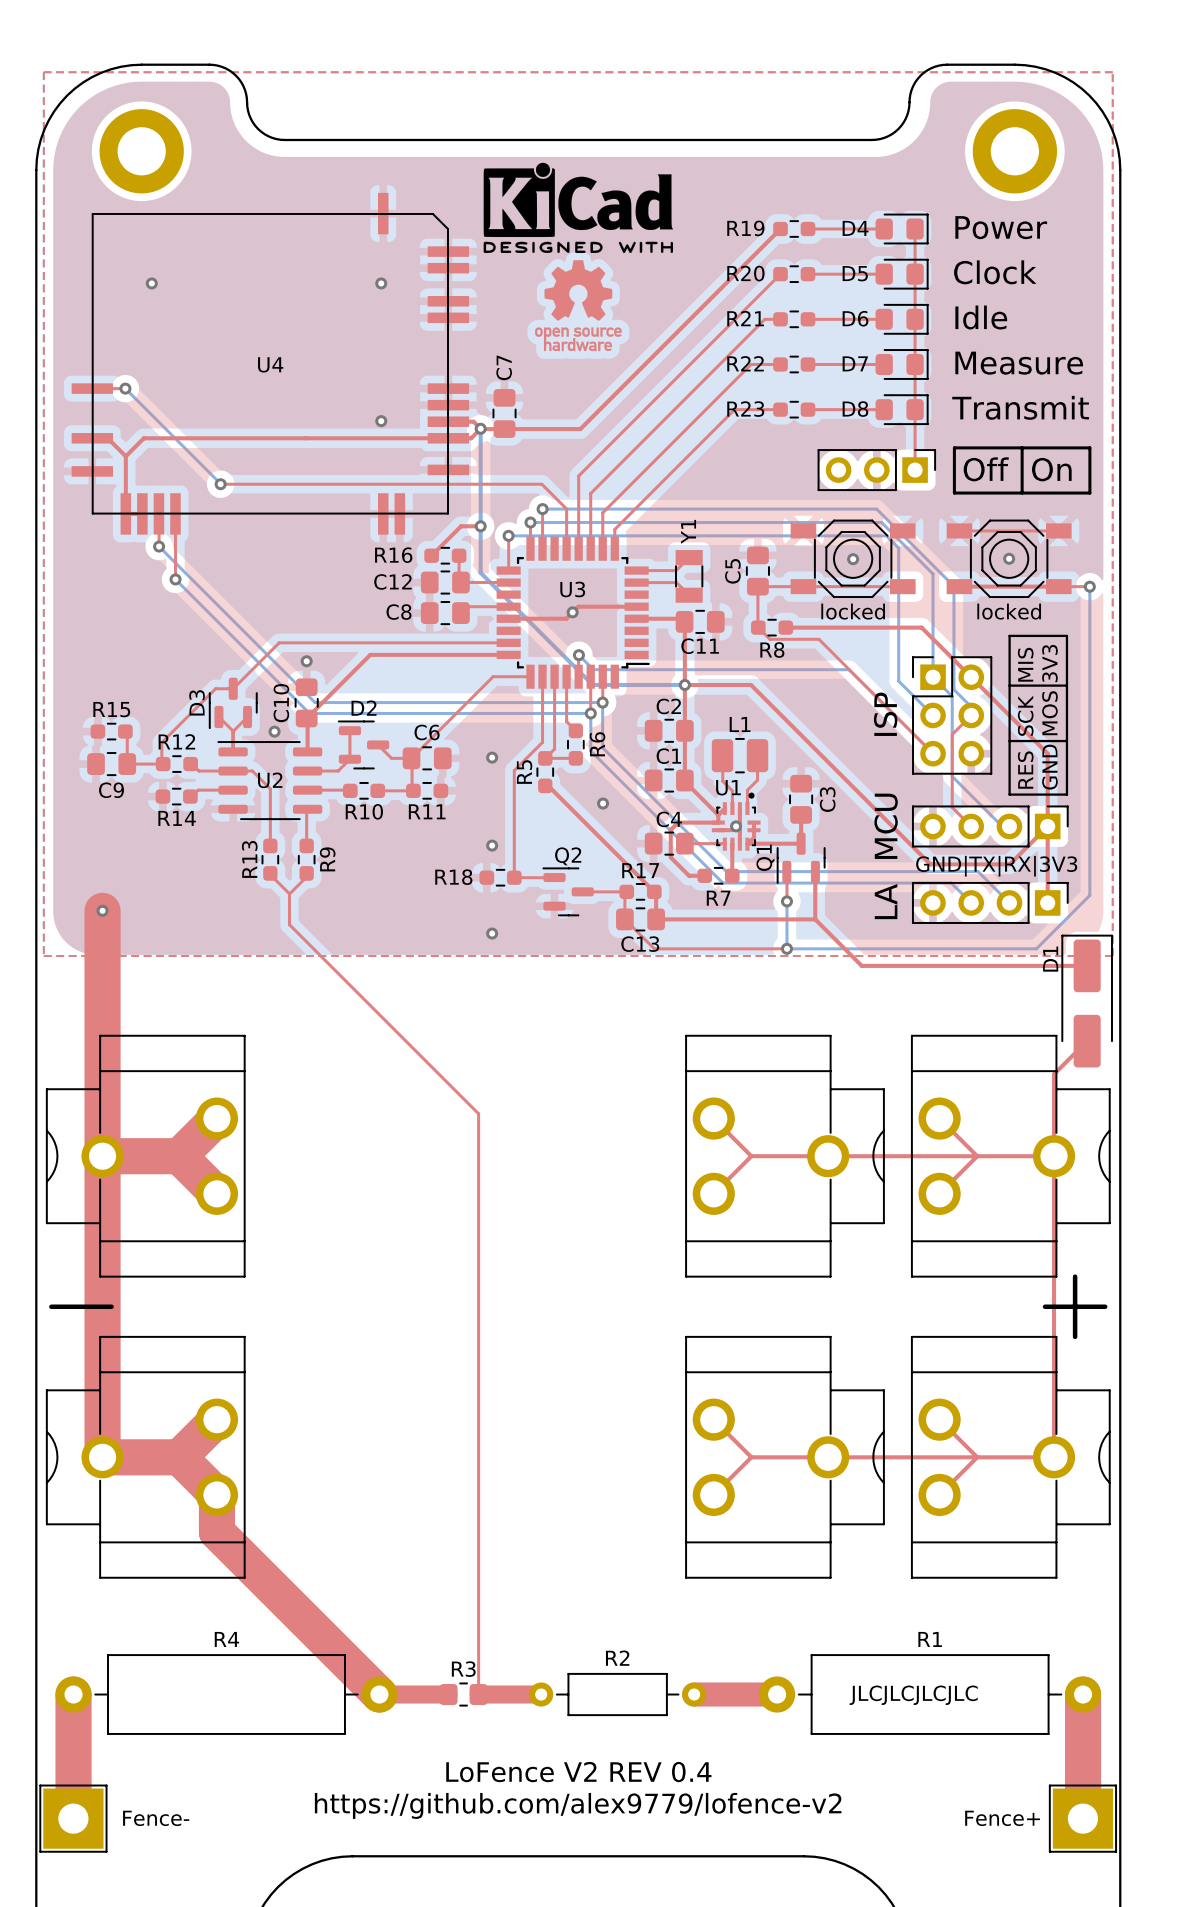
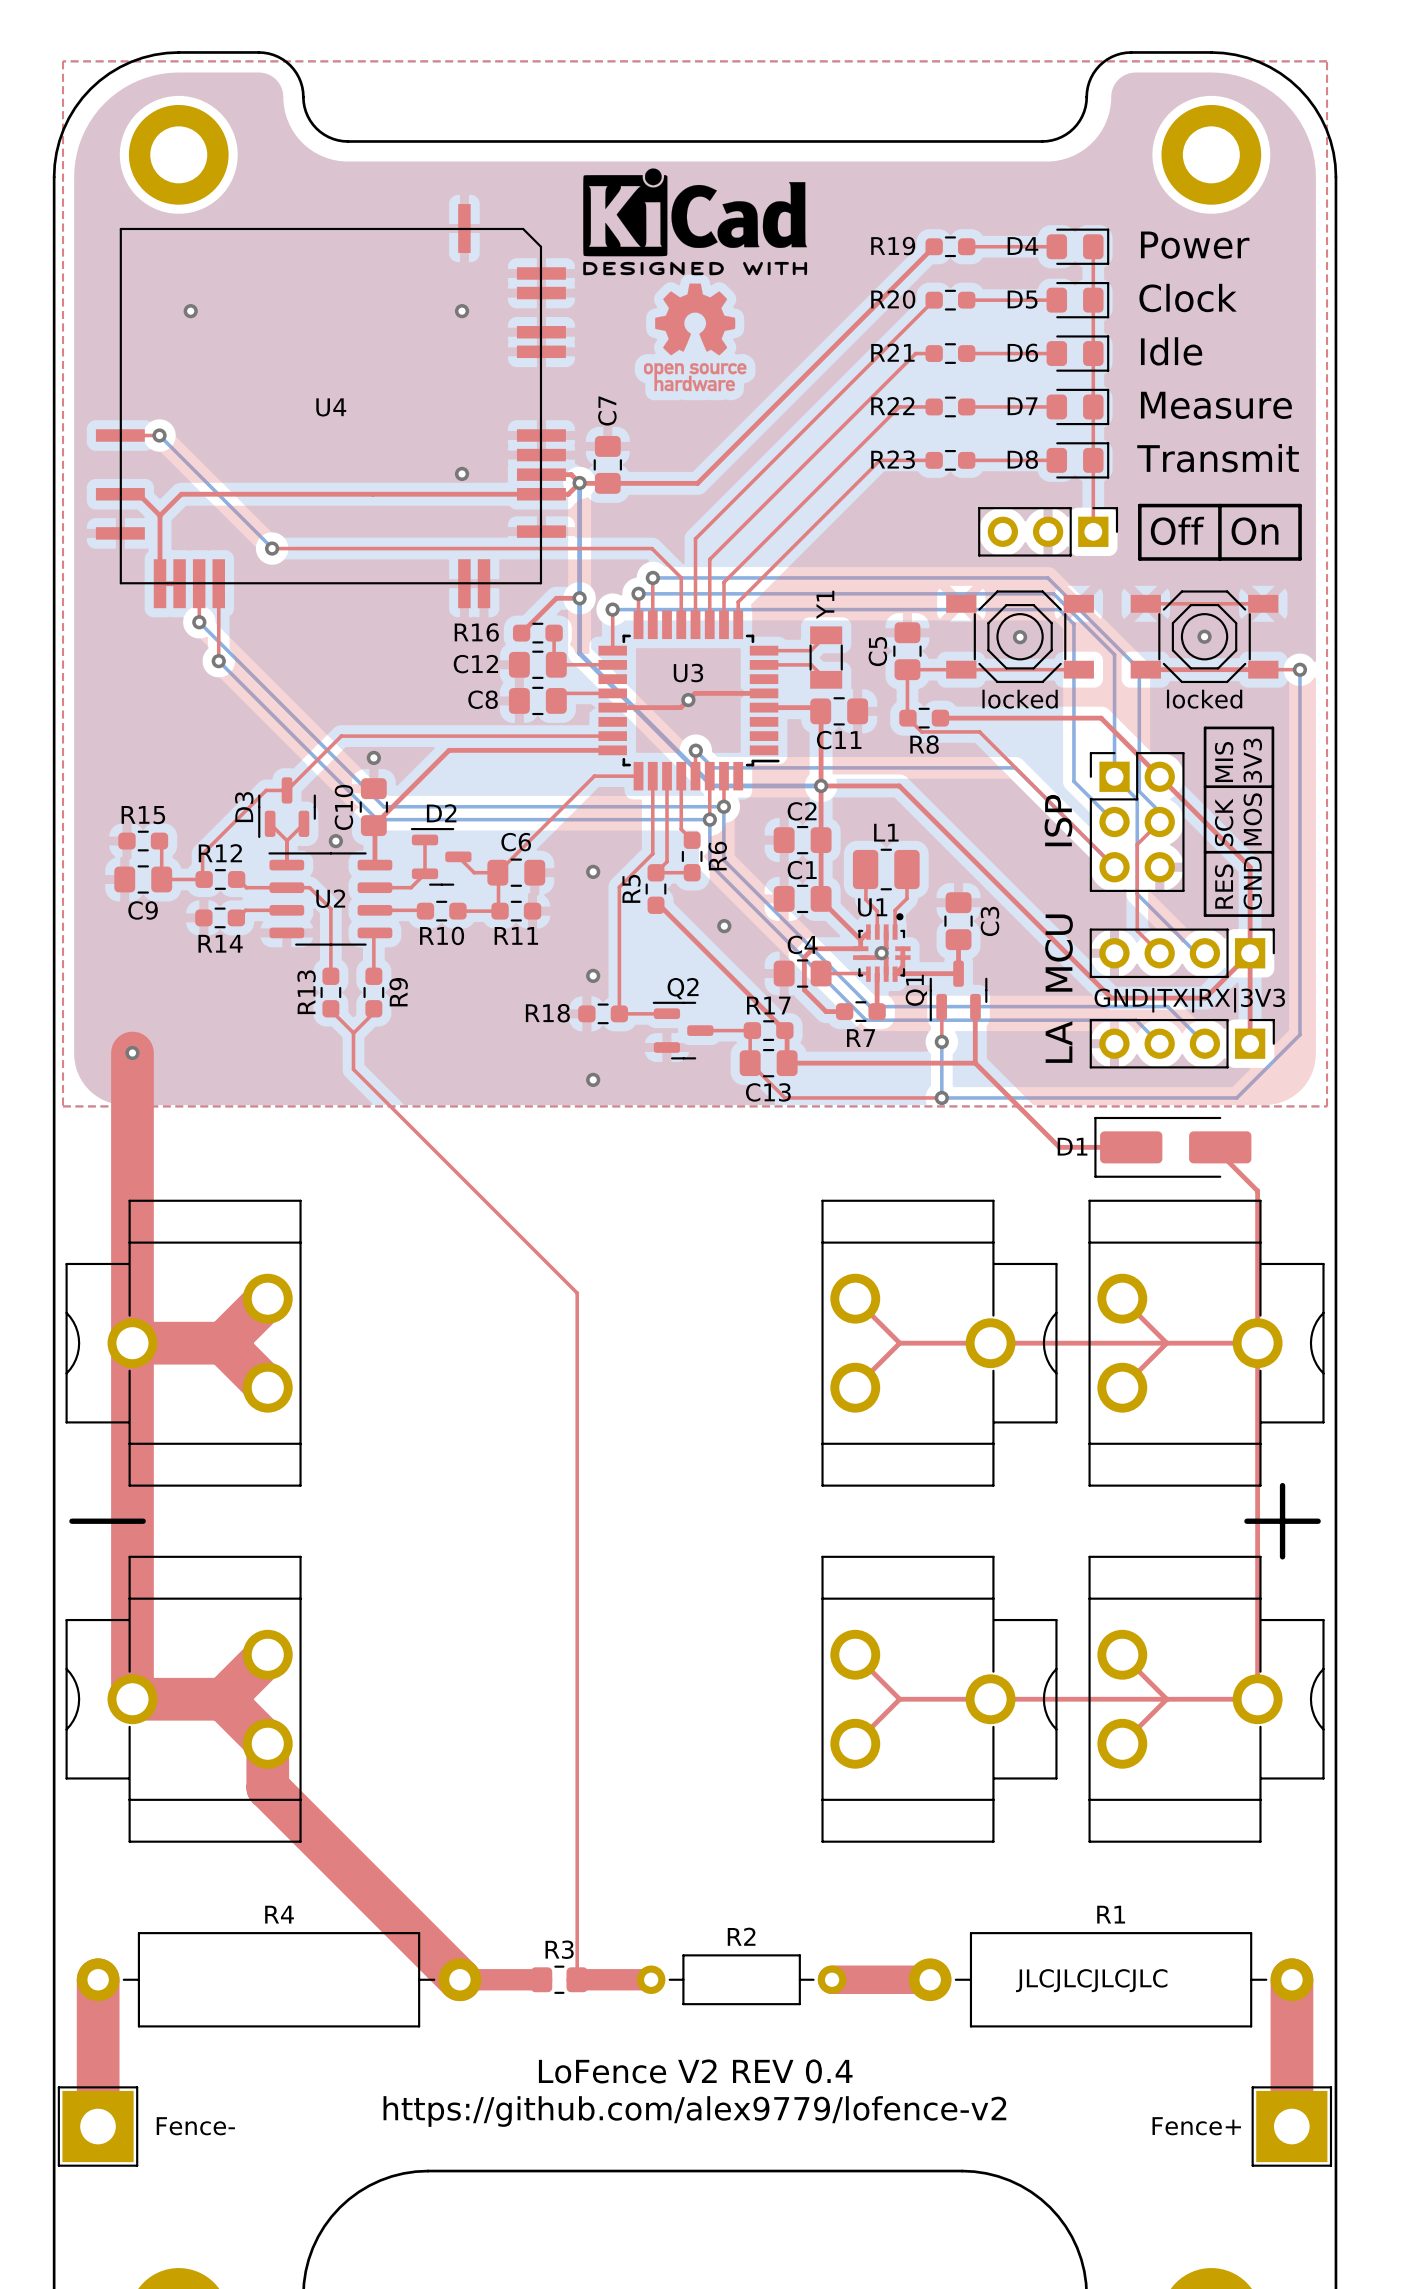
D1 name position: D1 (1050, 959) -> D1 (1072, 1146)
top track: (861, 965) (1087, 965) -> (1030, 1118) (1059, 1147) (1131, 1147)
D1 rotation: 0° (1087, 1001) -> 90° counterclockwise (1172, 1147)
D1 position: (1087, 1001) -> (1172, 1147)
top track: (1087, 1041) (1054, 1074) -> (1220, 1153) (1257, 1190) (1257, 1246)

